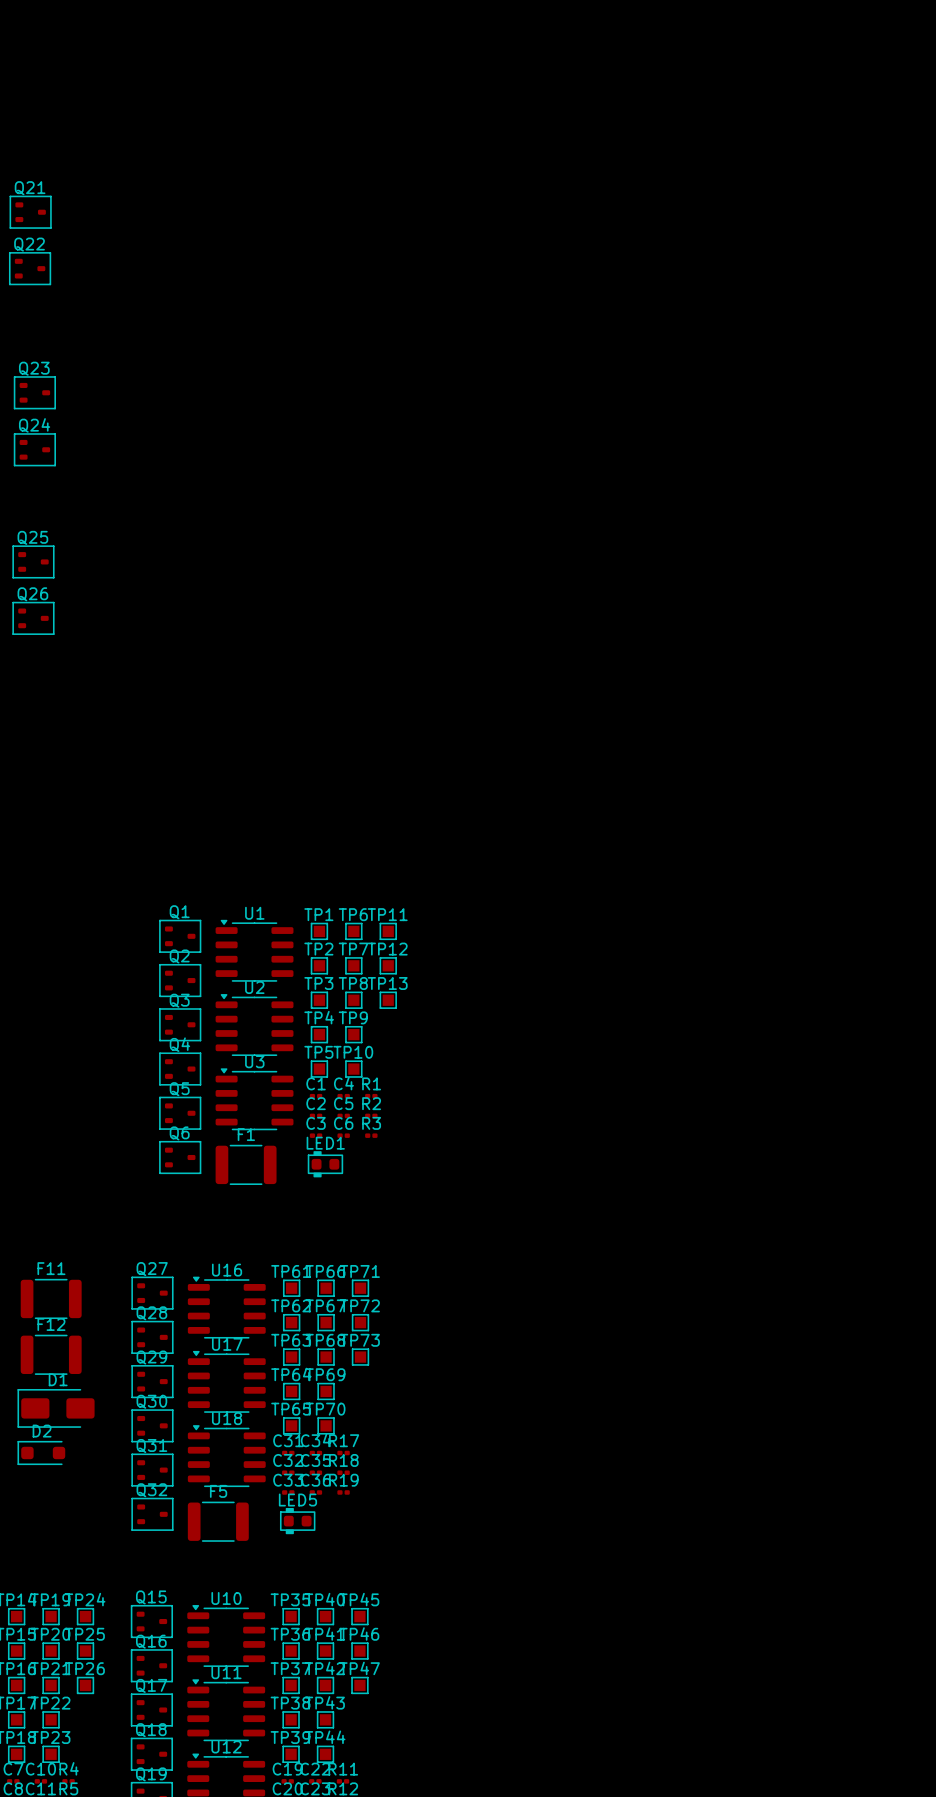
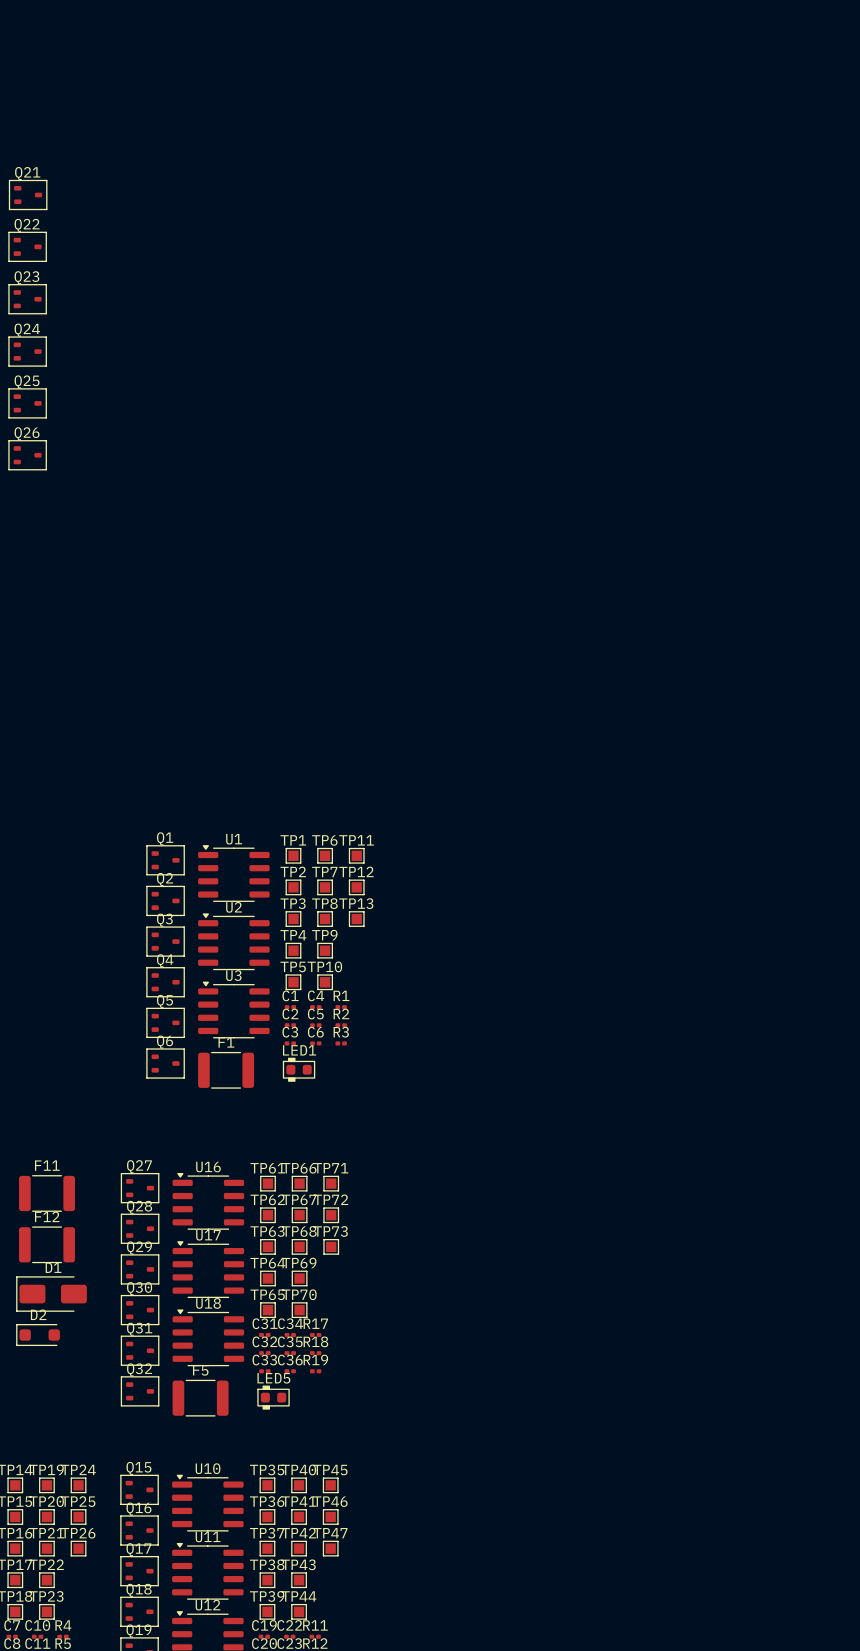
Q23 position: (34, 392) -> (27, 299)
Q24 position: (34, 449) -> (27, 351)
Q25 position: (33, 561) -> (27, 403)
Q26 position: (33, 618) -> (27, 455)

